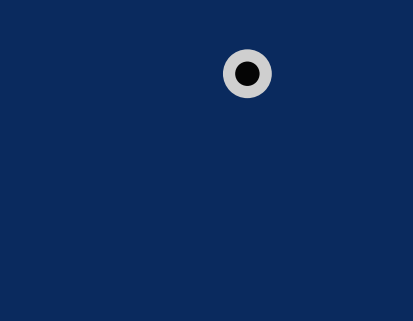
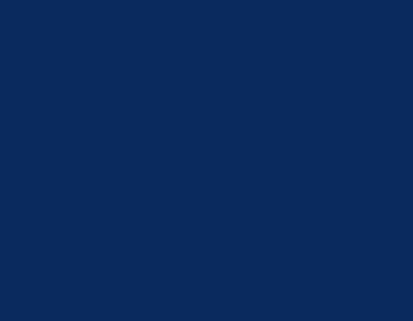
part: (247, 73) -> none

